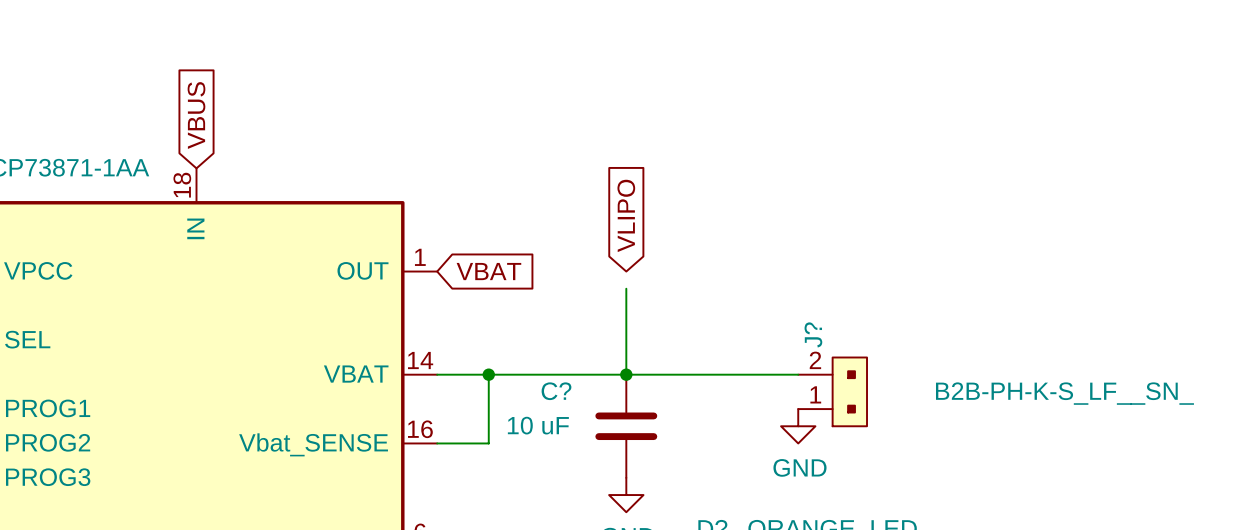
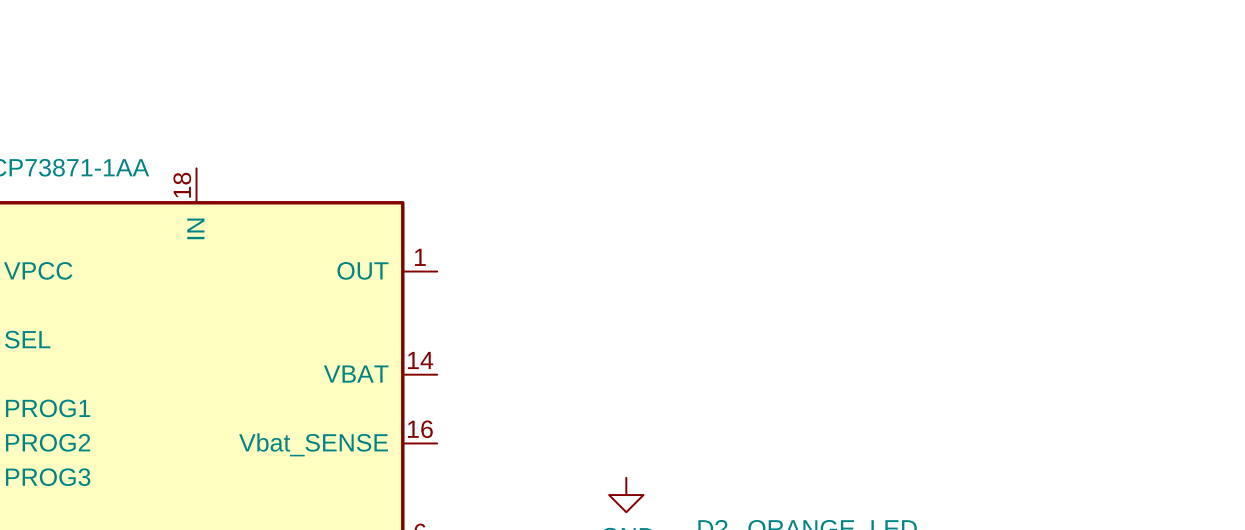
global label: VBUS (196, 115) -> none
global label: VLIPO (626, 215) -> none
global label: VBAT (488, 271) -> none
wire: (626, 288) (626, 374) -> none
wire: (437, 374) (798, 374) -> none
wire: (488, 374) (488, 443) (437, 443) -> none
junction: (488, 374) -> none
junction: (626, 374) -> none
J?: B2B-PH-K-S_LF__SN_ (832, 391) -> none
C?: 10 uF (626, 426) -> none
power symbol: GND (798, 426) -> none

